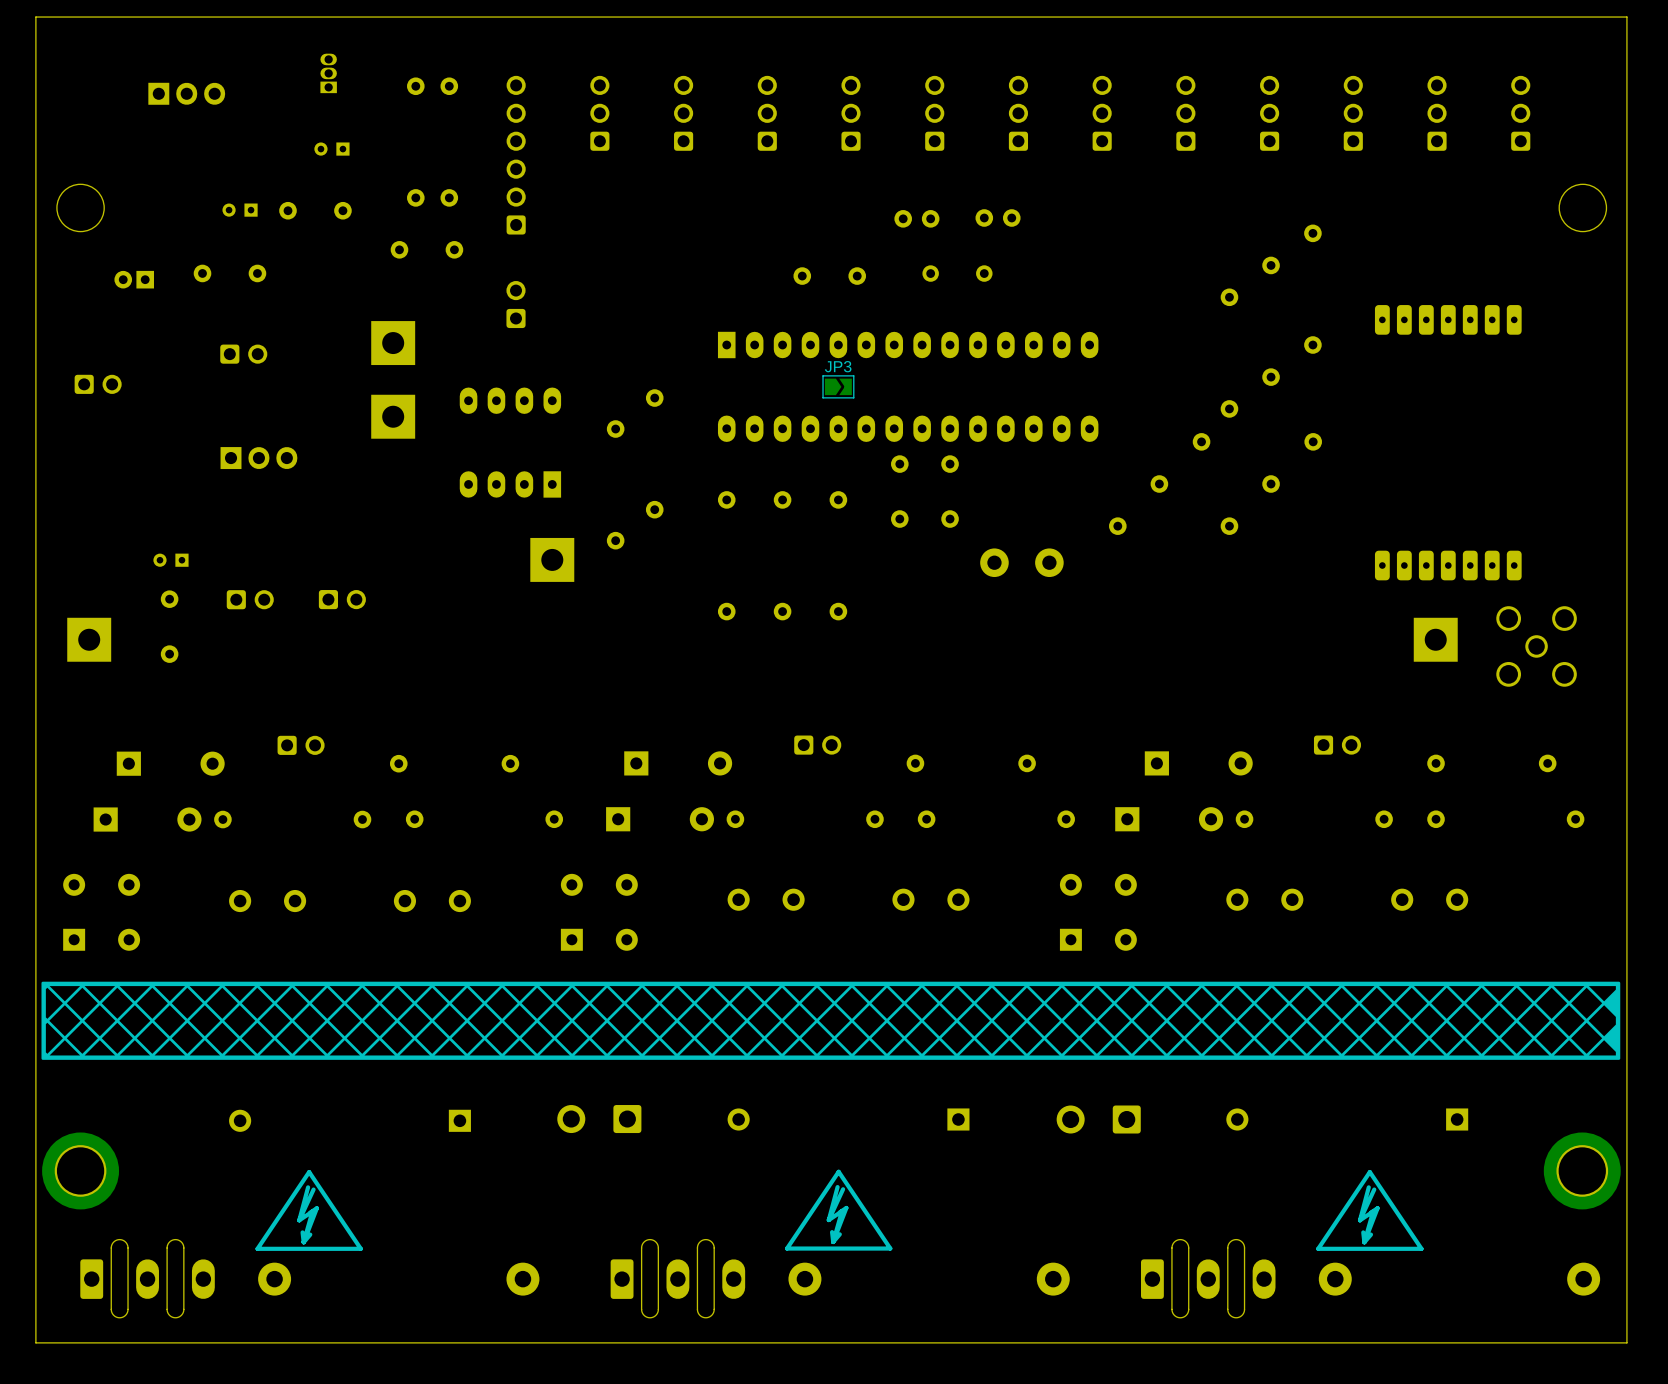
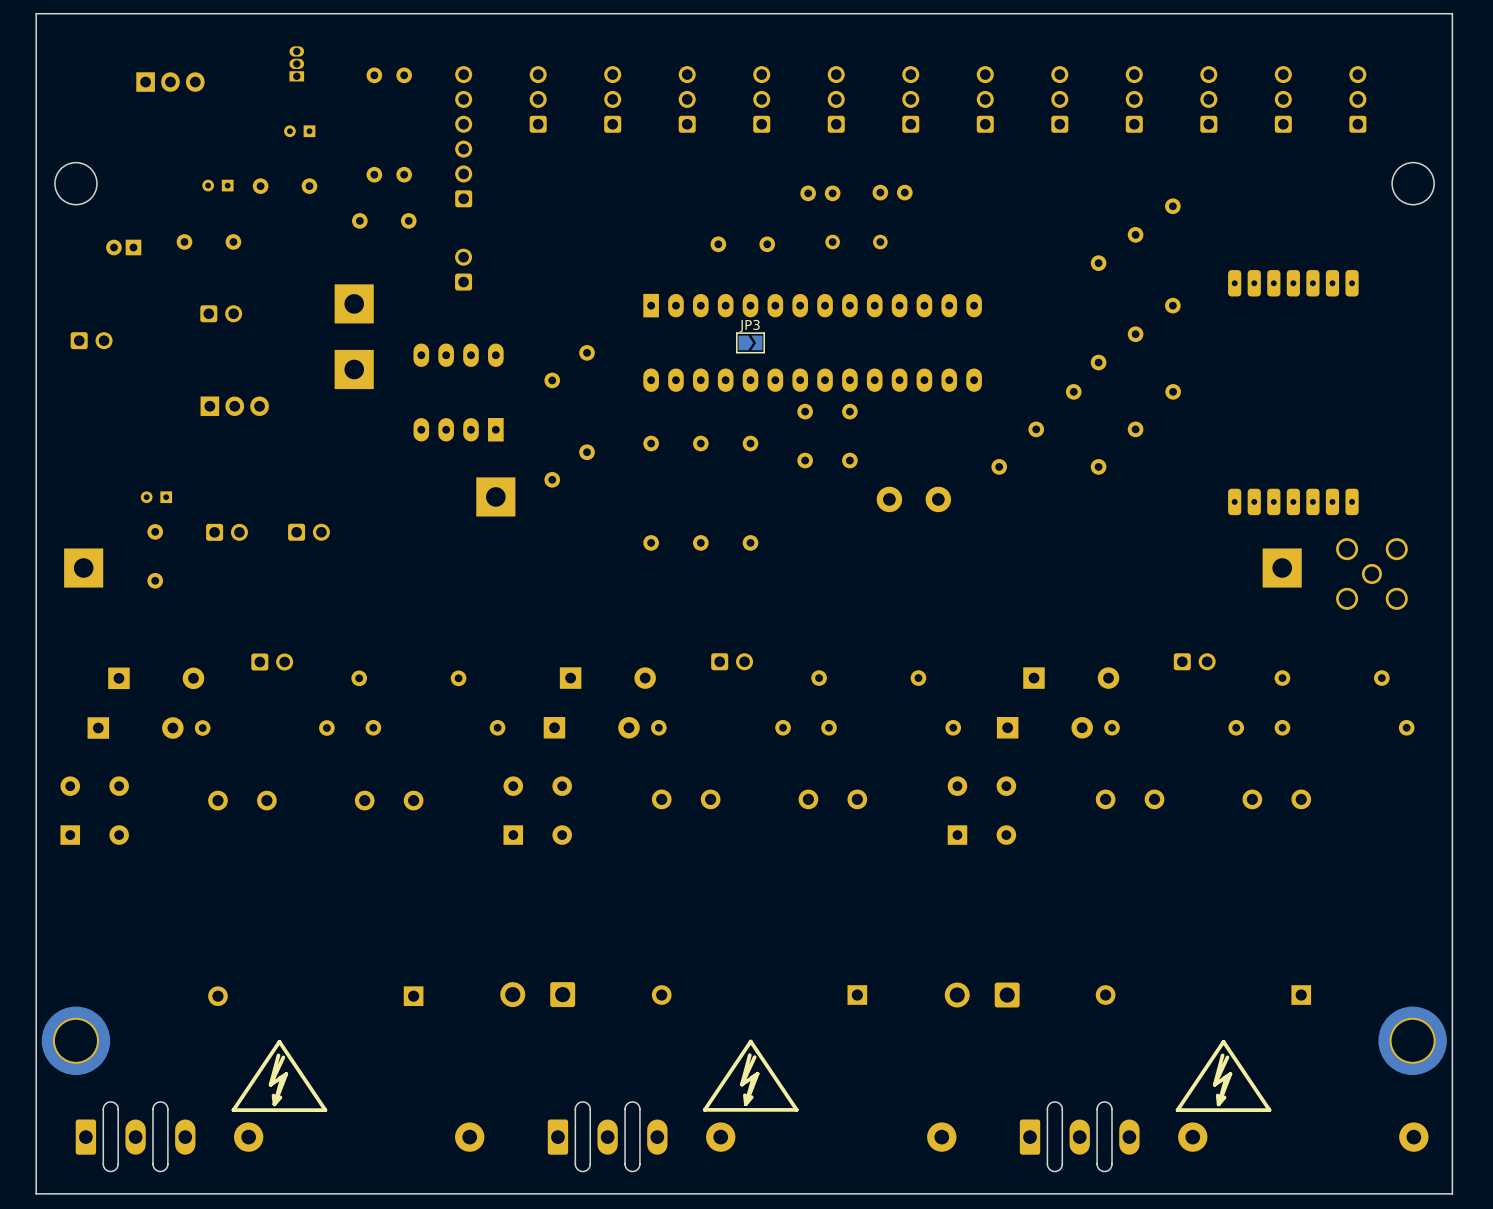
drawing: [41, 981, 1621, 1060] -> none

